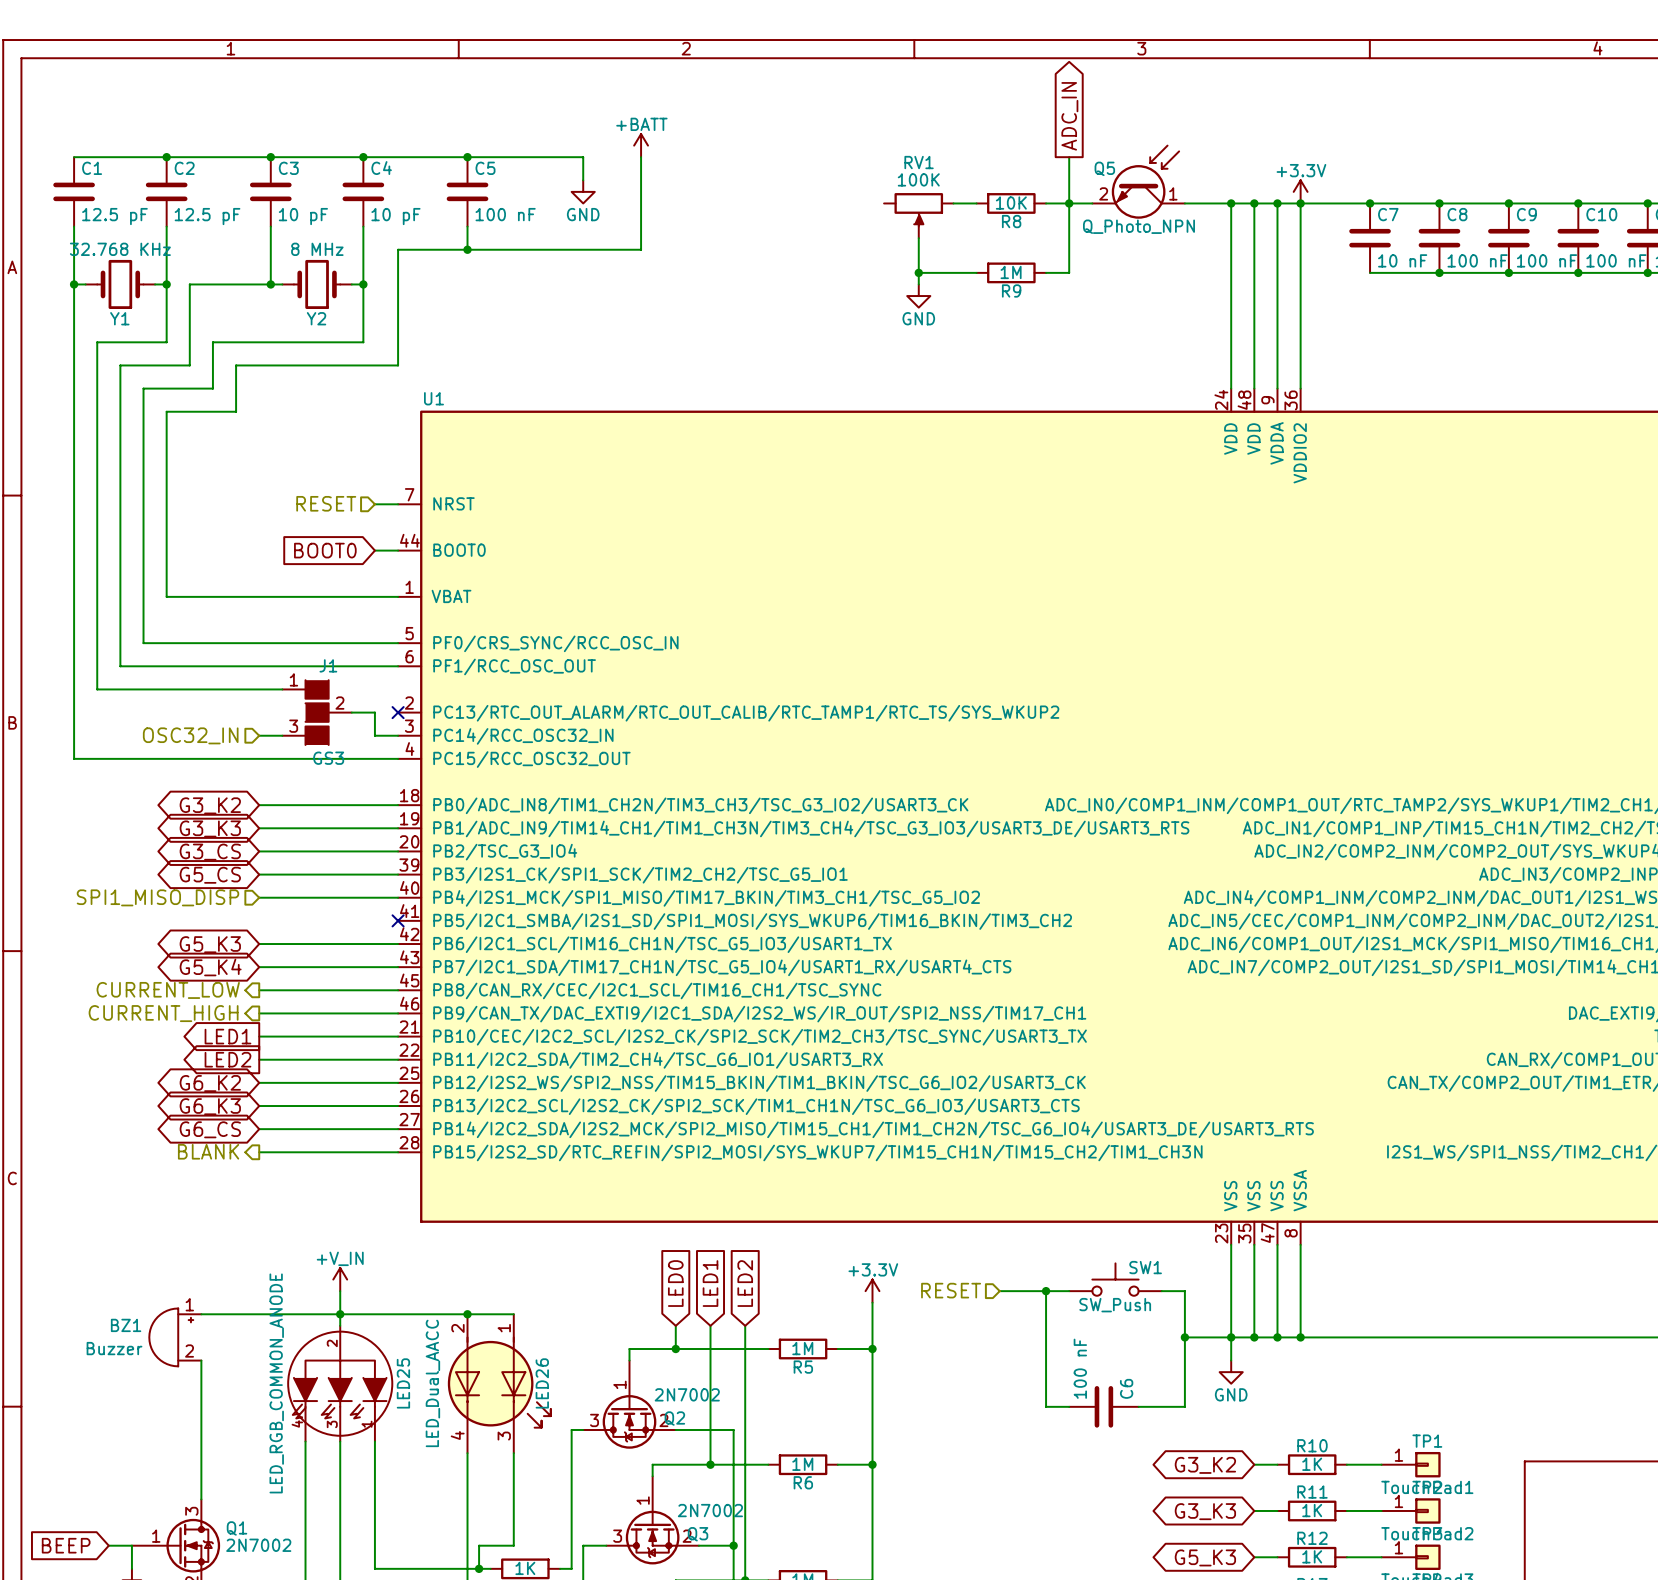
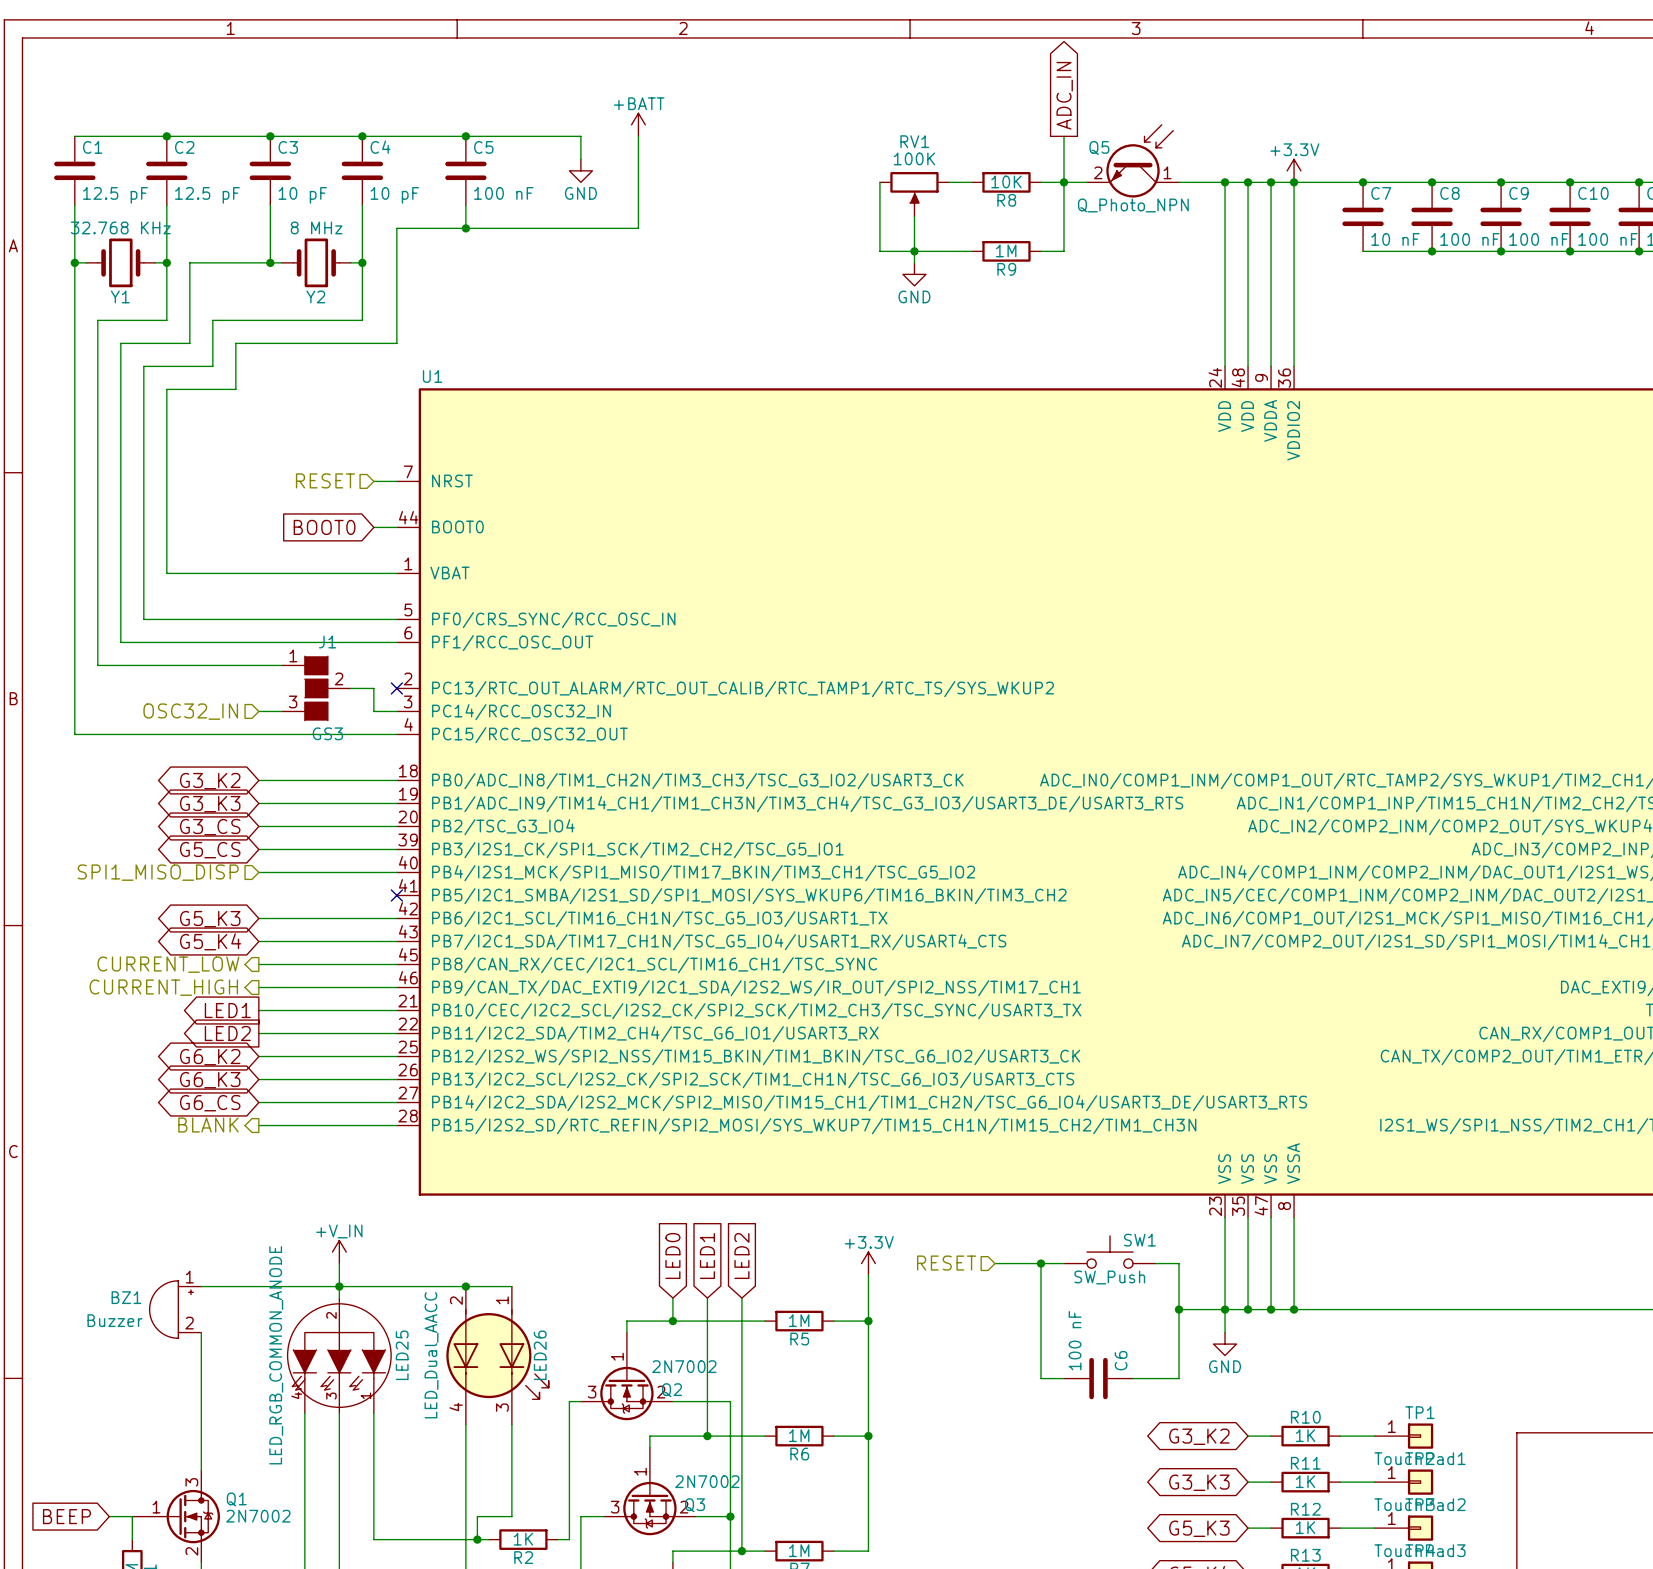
wire: none -> (879, 182) (879, 251) (914, 251)

